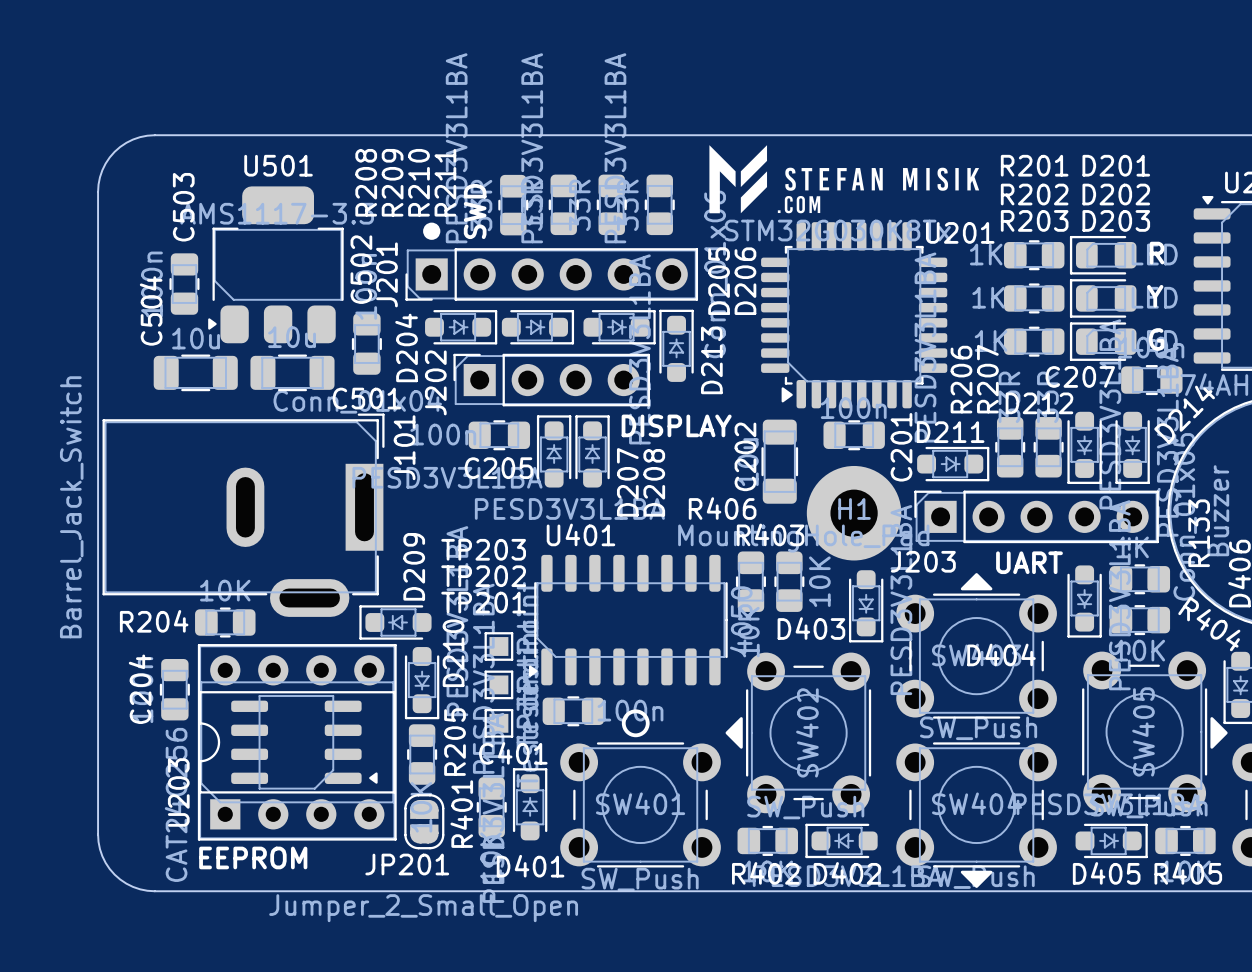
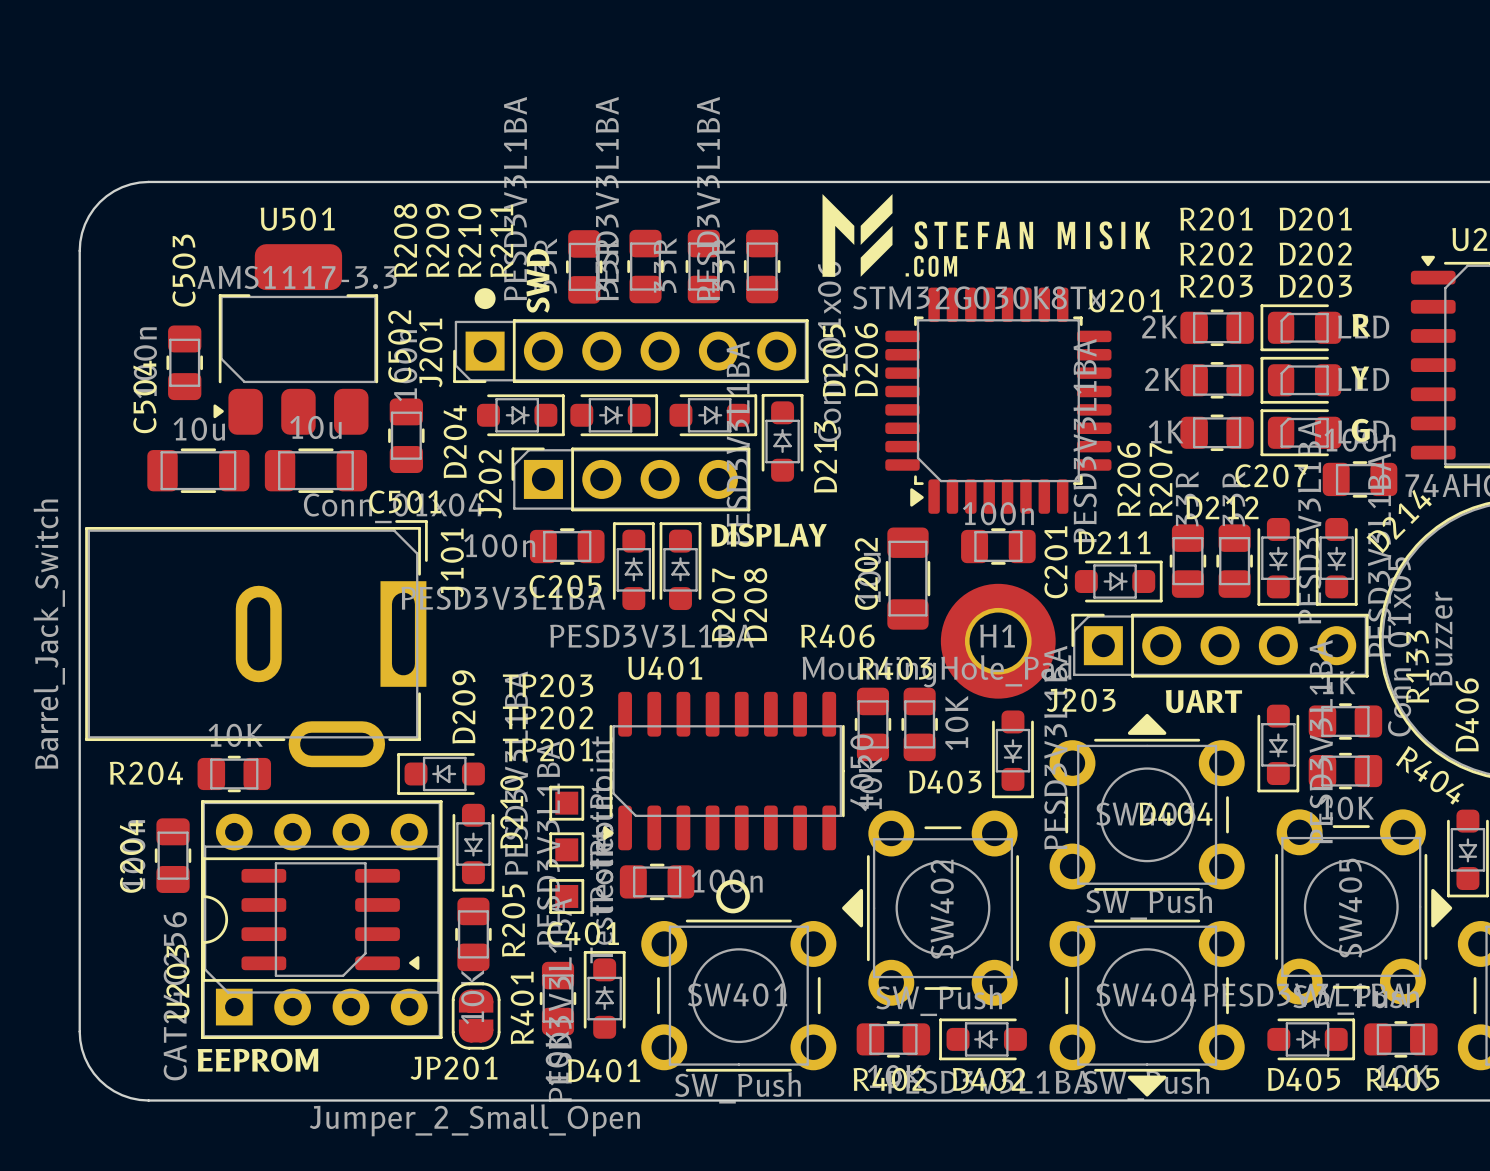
R201 value: 1K (986, 254) -> 2K (1159, 326)
R202 value: 1K (988, 297) -> 2K (1162, 379)

